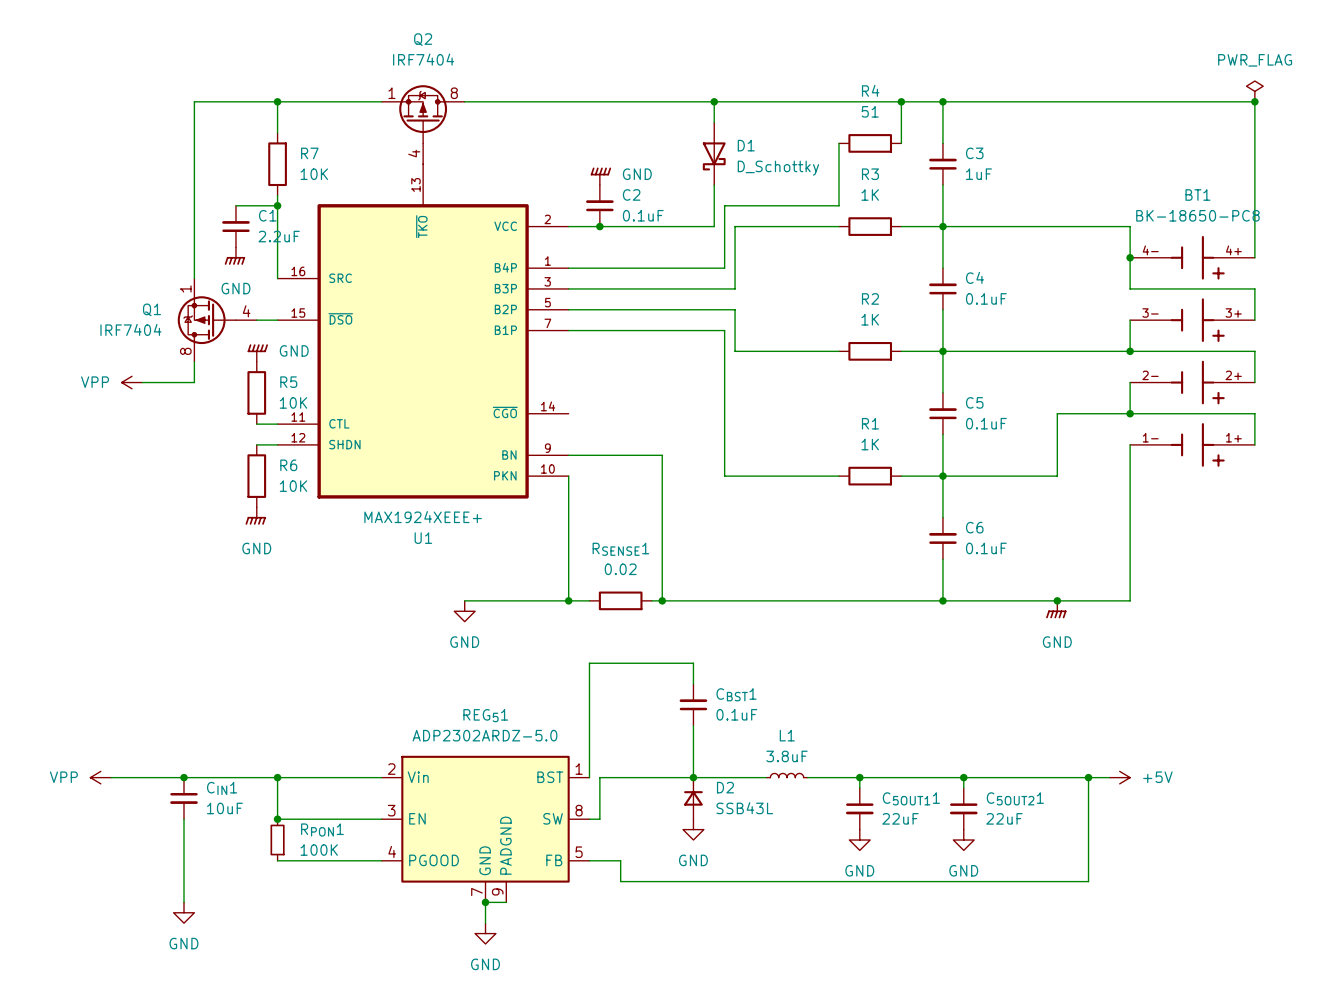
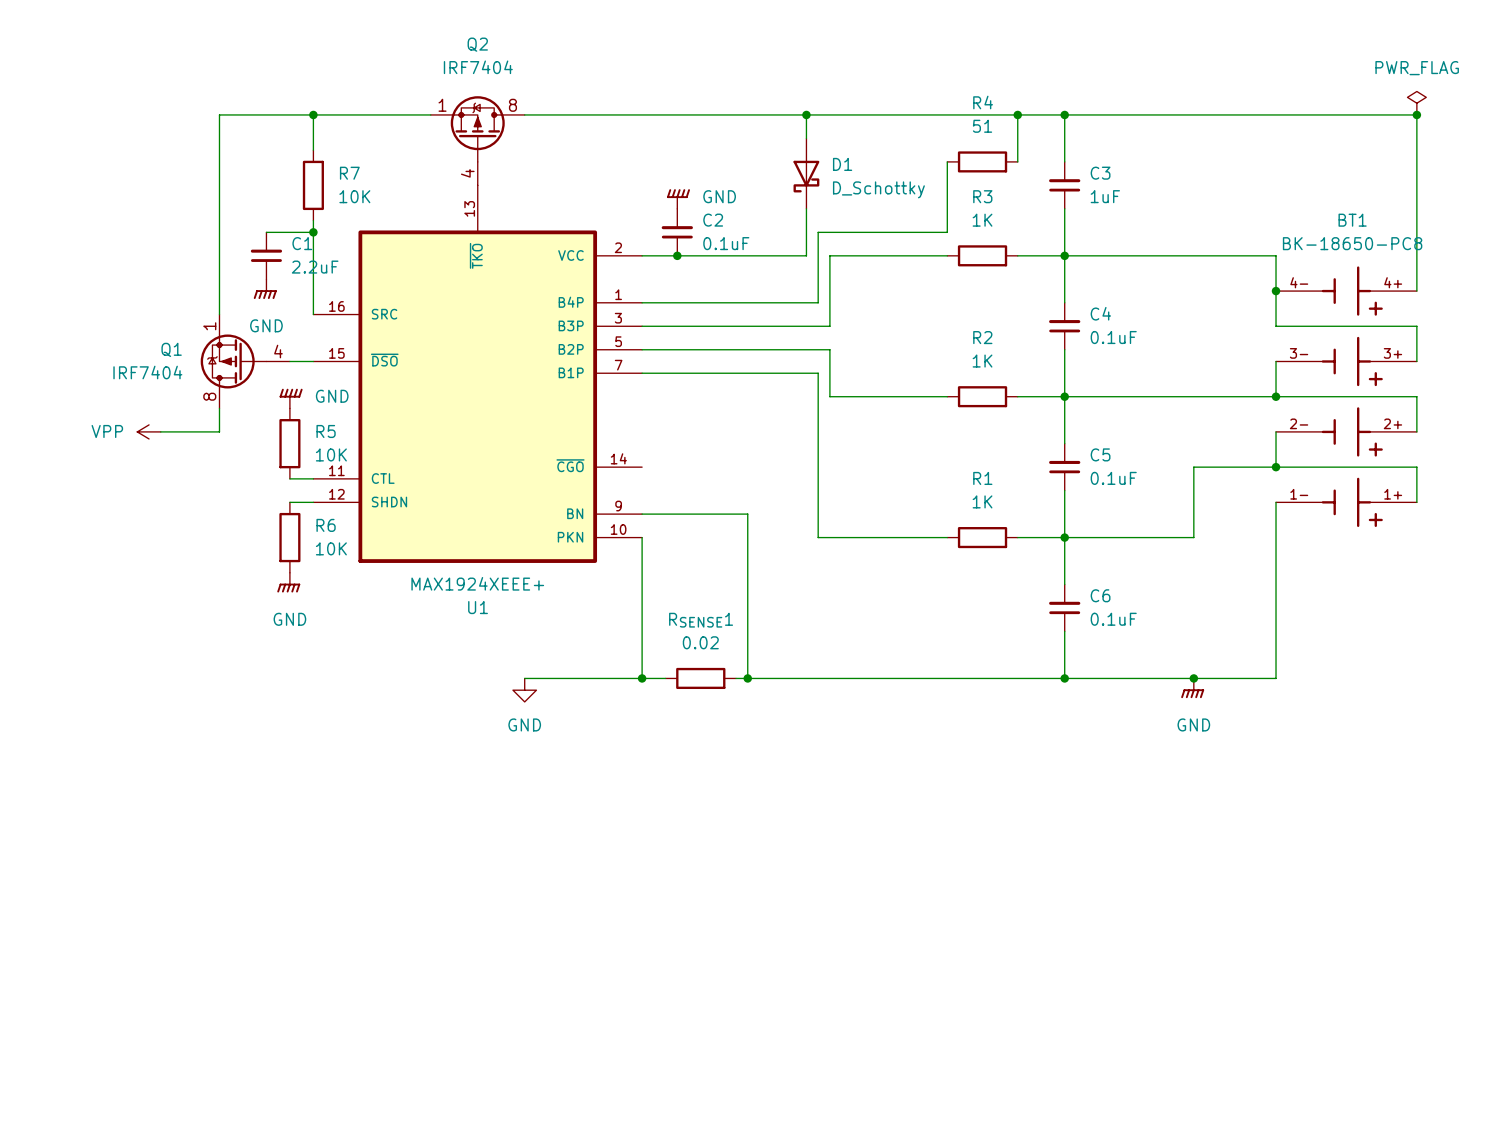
wire: (693, 684) (693, 663) (589, 663) (589, 777) -> none
CBST1: 0.1uF (693, 704) -> none
wire: (693, 725) (693, 777) -> none
L1: 3.8uF (787, 775) -> none
power symbol: VPP (100, 777) -> none
wire: (111, 777) (381, 777) -> none
junction: (183, 777) -> none
wire: (277, 777) (277, 819) (381, 819) -> none
junction: (277, 777) -> none
junction: (693, 777) -> none
wire: (766, 777) (599, 777) (599, 819) (589, 819) -> none
wire: (807, 777) (1109, 777) -> none
wire: (859, 777) (859, 788) -> none
junction: (859, 777) -> none
wire: (963, 777) (963, 788) -> none
junction: (963, 777) -> none
wire: (1088, 777) (1088, 881) (620, 881) (620, 860) (589, 860) -> none
junction: (1088, 777) -> none
power symbol: +5V (1119, 777) -> none
CIN1: 10uF (183, 798) -> none
D2: SSB43L (693, 798) -> none
C5OUT11: 22uF (859, 808) -> none
C5OUT21: 22uF (963, 808) -> none
wire: (183, 819) (183, 902) -> none
junction: (277, 819) -> none
REG51: ADP2302ARDZ-5.0 (485, 829) -> none
power symbol: GND (693, 829) -> none
RPON1: 100K (277, 840) -> none
power symbol: GND (859, 840) -> none
power symbol: GND (963, 840) -> none
wire: (277, 860) (381, 860) -> none
junction: (485, 902) -> none
wire: (506, 902) (485, 902) (485, 923) -> none
power symbol: GND (183, 912) -> none
power symbol: GND (485, 933) -> none

